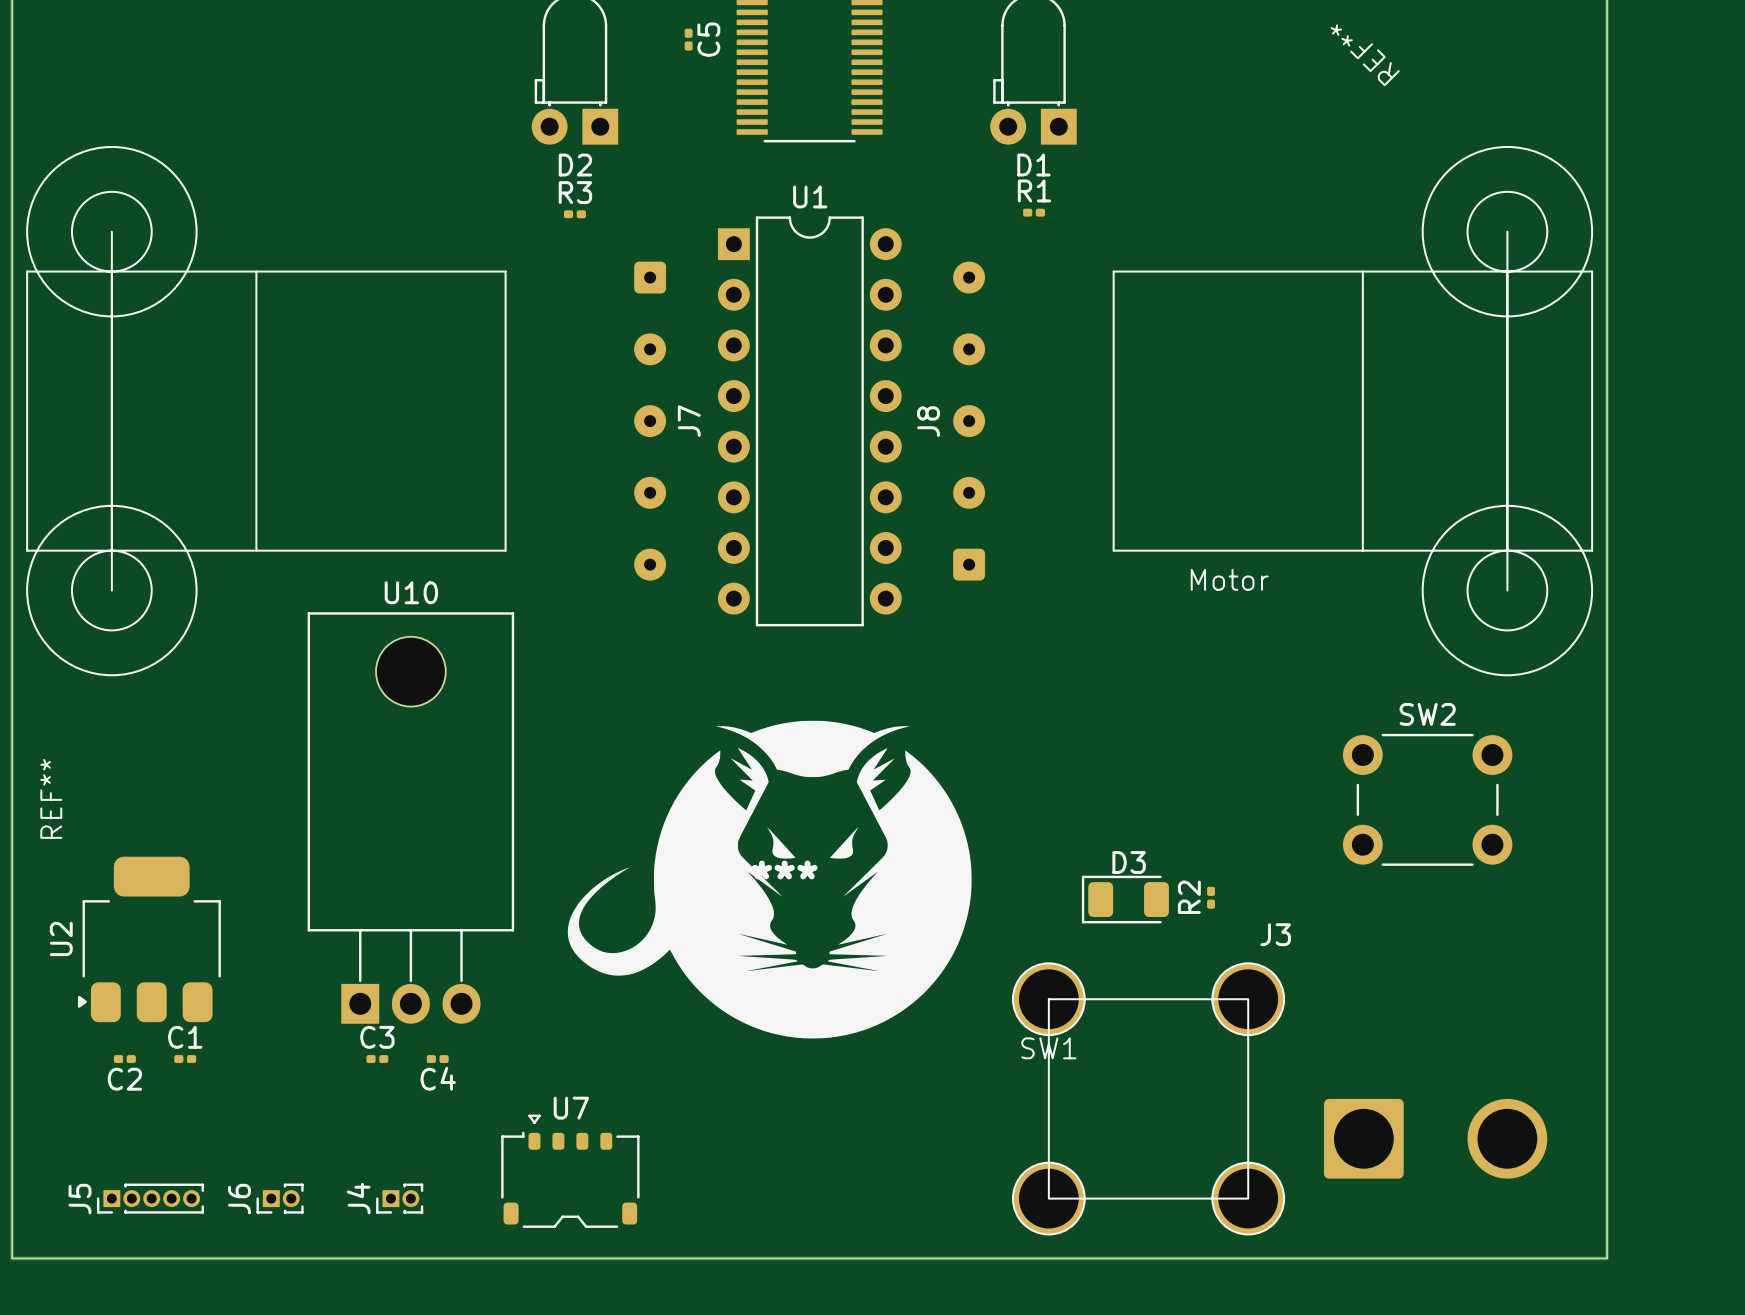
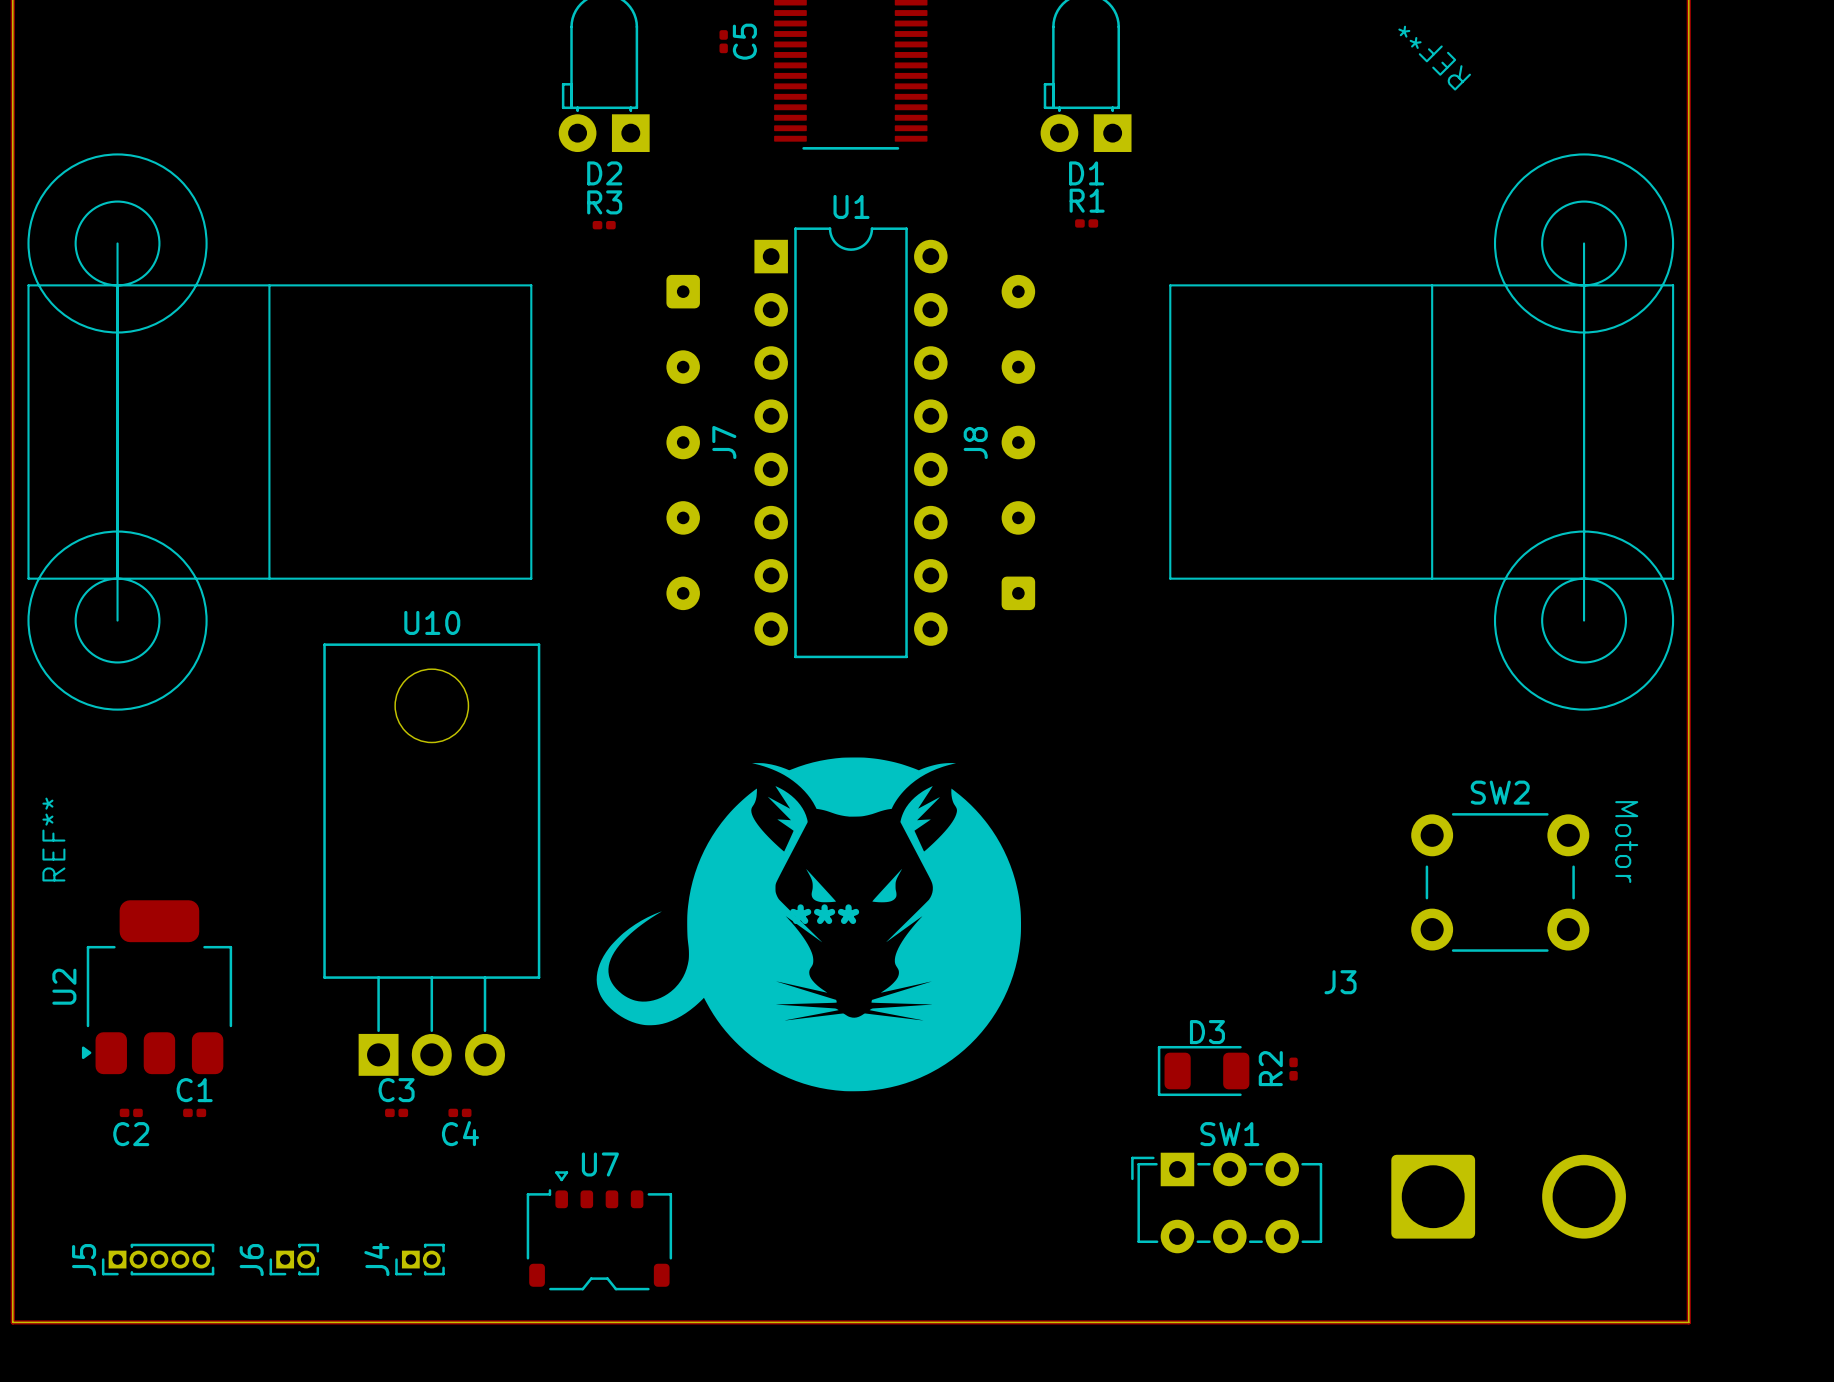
Motor name rotation: 0° (1229, 579) -> 90° clockwise (1626, 842)
Motor name position: Motor (1229, 579) -> Motor (1626, 842)
SW2 position: (1427, 799) -> (1500, 882)
R2 position: (1211, 897) -> (1293, 1069)
D3 position: (1125, 899) -> (1203, 1071)
SW1 footprint: [1011, 962, 1286, 1236] -> [1131, 1152, 1323, 1254]
SW1 name position: SW1 (1048, 1048) -> SW1 (1229, 1134)

